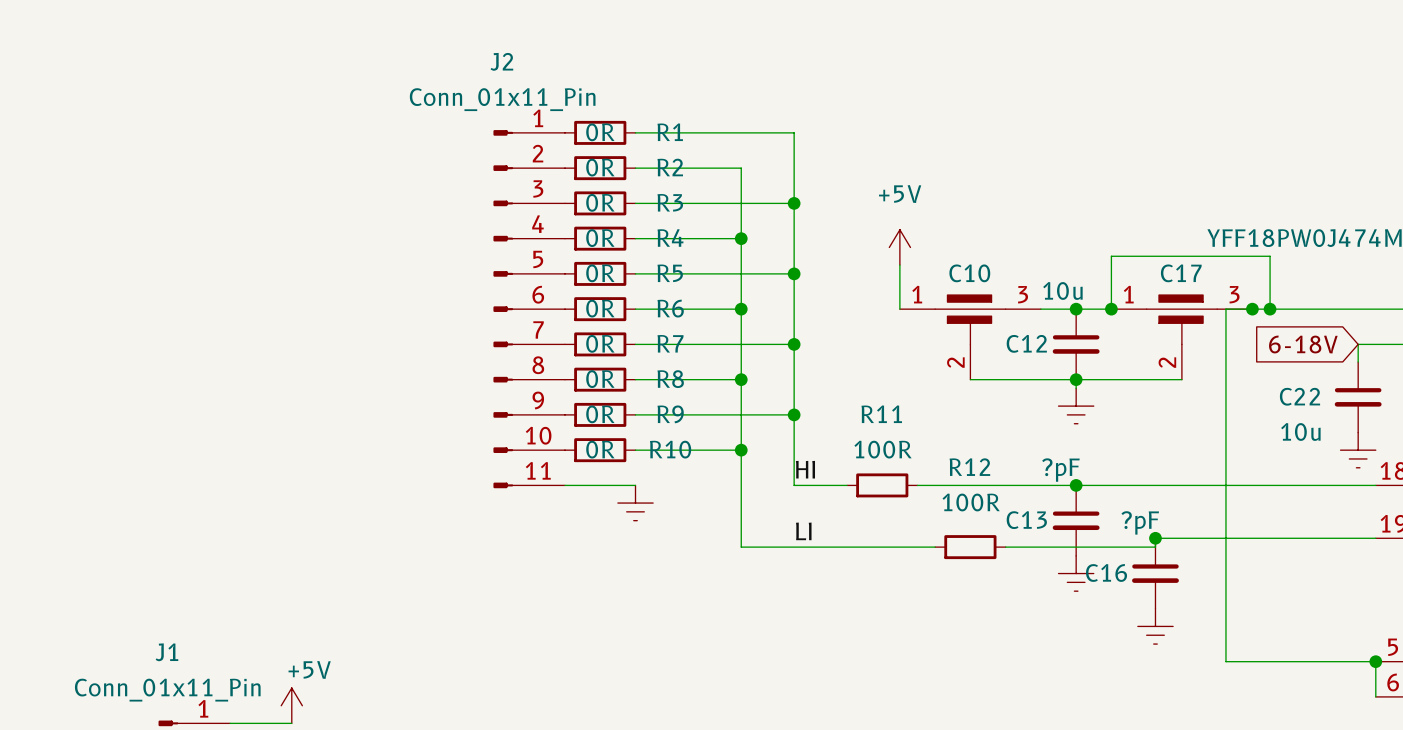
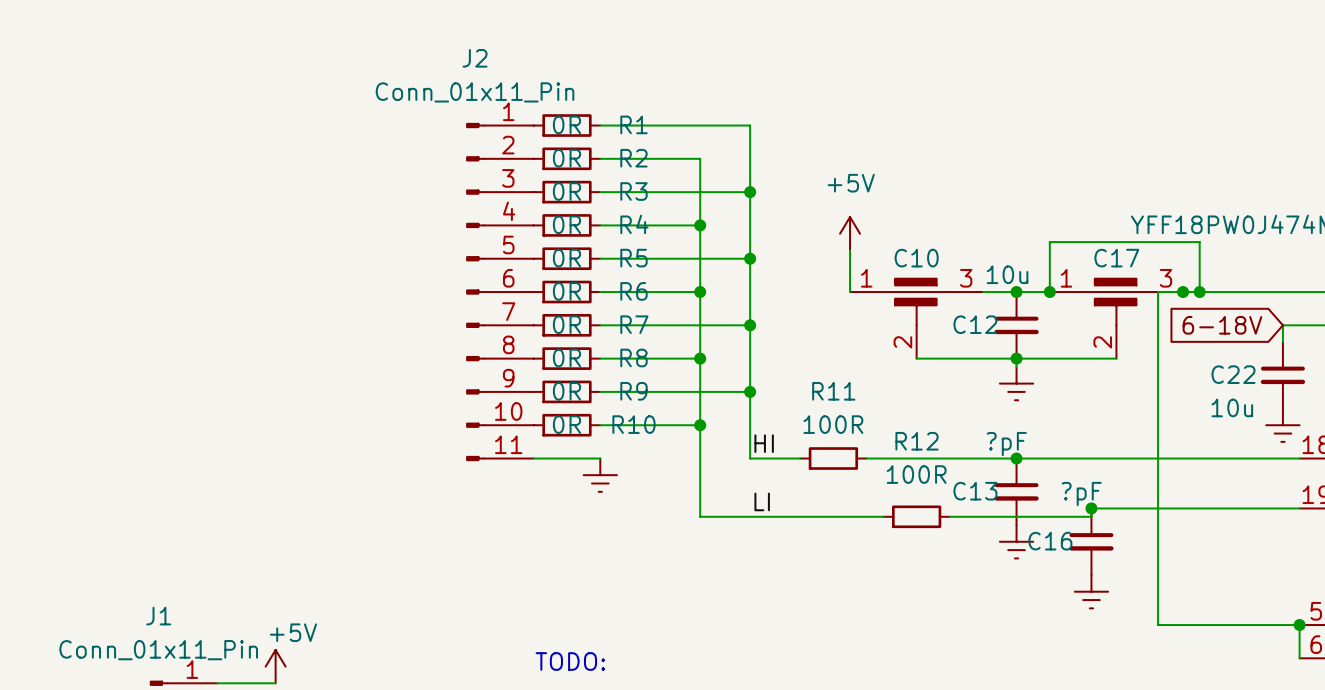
text: none -> TODO: (570, 661)

